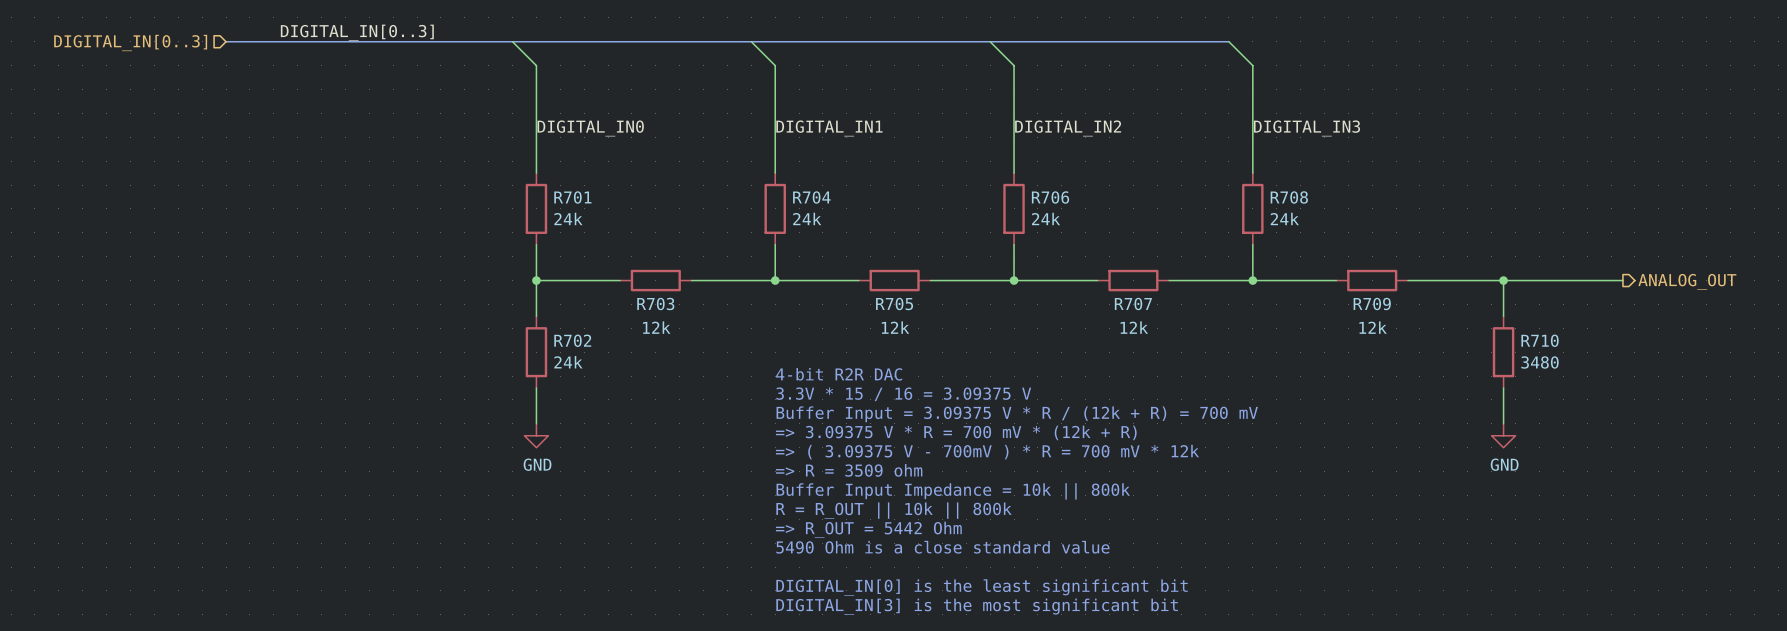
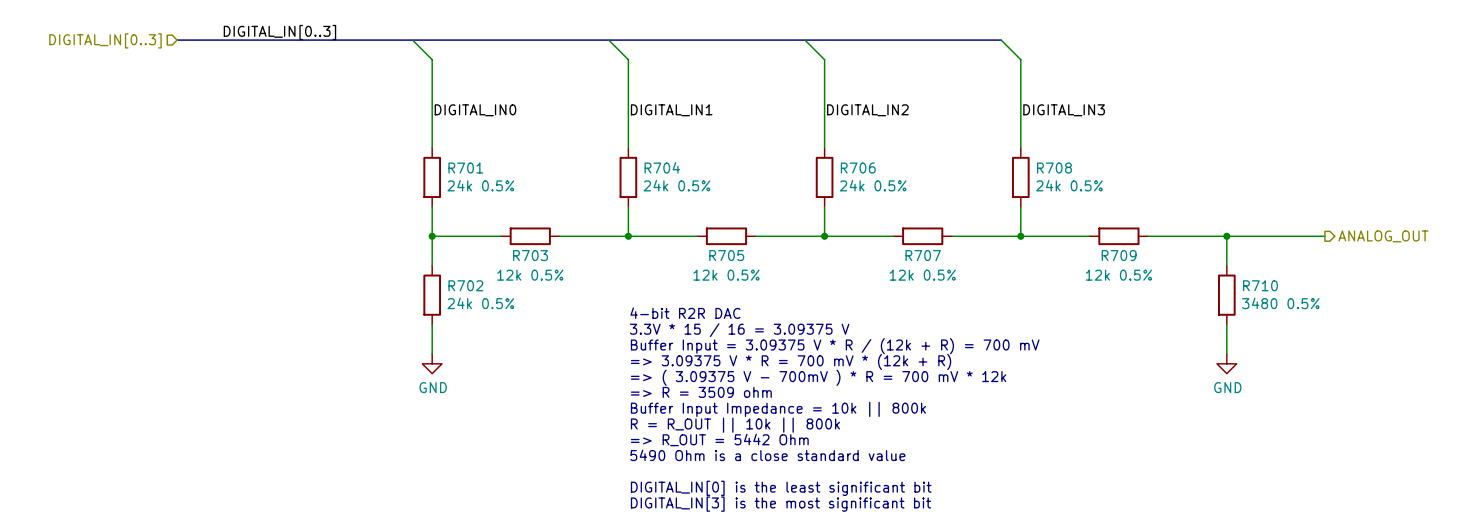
R701 value: 24k (568, 218) -> 24k 0.5% (480, 185)
R704 value: 24k (807, 218) -> 24k 0.5% (677, 185)
R706 value: 24k (1046, 218) -> 24k 0.5% (873, 185)
R708 value: 24k (1284, 218) -> 24k 0.5% (1069, 185)
R703 value: 12k (656, 327) -> 12k 0.5% (530, 275)
R705 value: 12k (895, 327) -> 12k 0.5% (726, 275)
R707 value: 12k (1134, 327) -> 12k 0.5% (922, 275)
R709 value: 12k (1373, 327) -> 12k 0.5% (1118, 275)
R702 value: 24k (568, 362) -> 24k 0.5% (480, 303)
R710 value: 3480 (1540, 362) -> 3480 0.5% (1280, 303)

